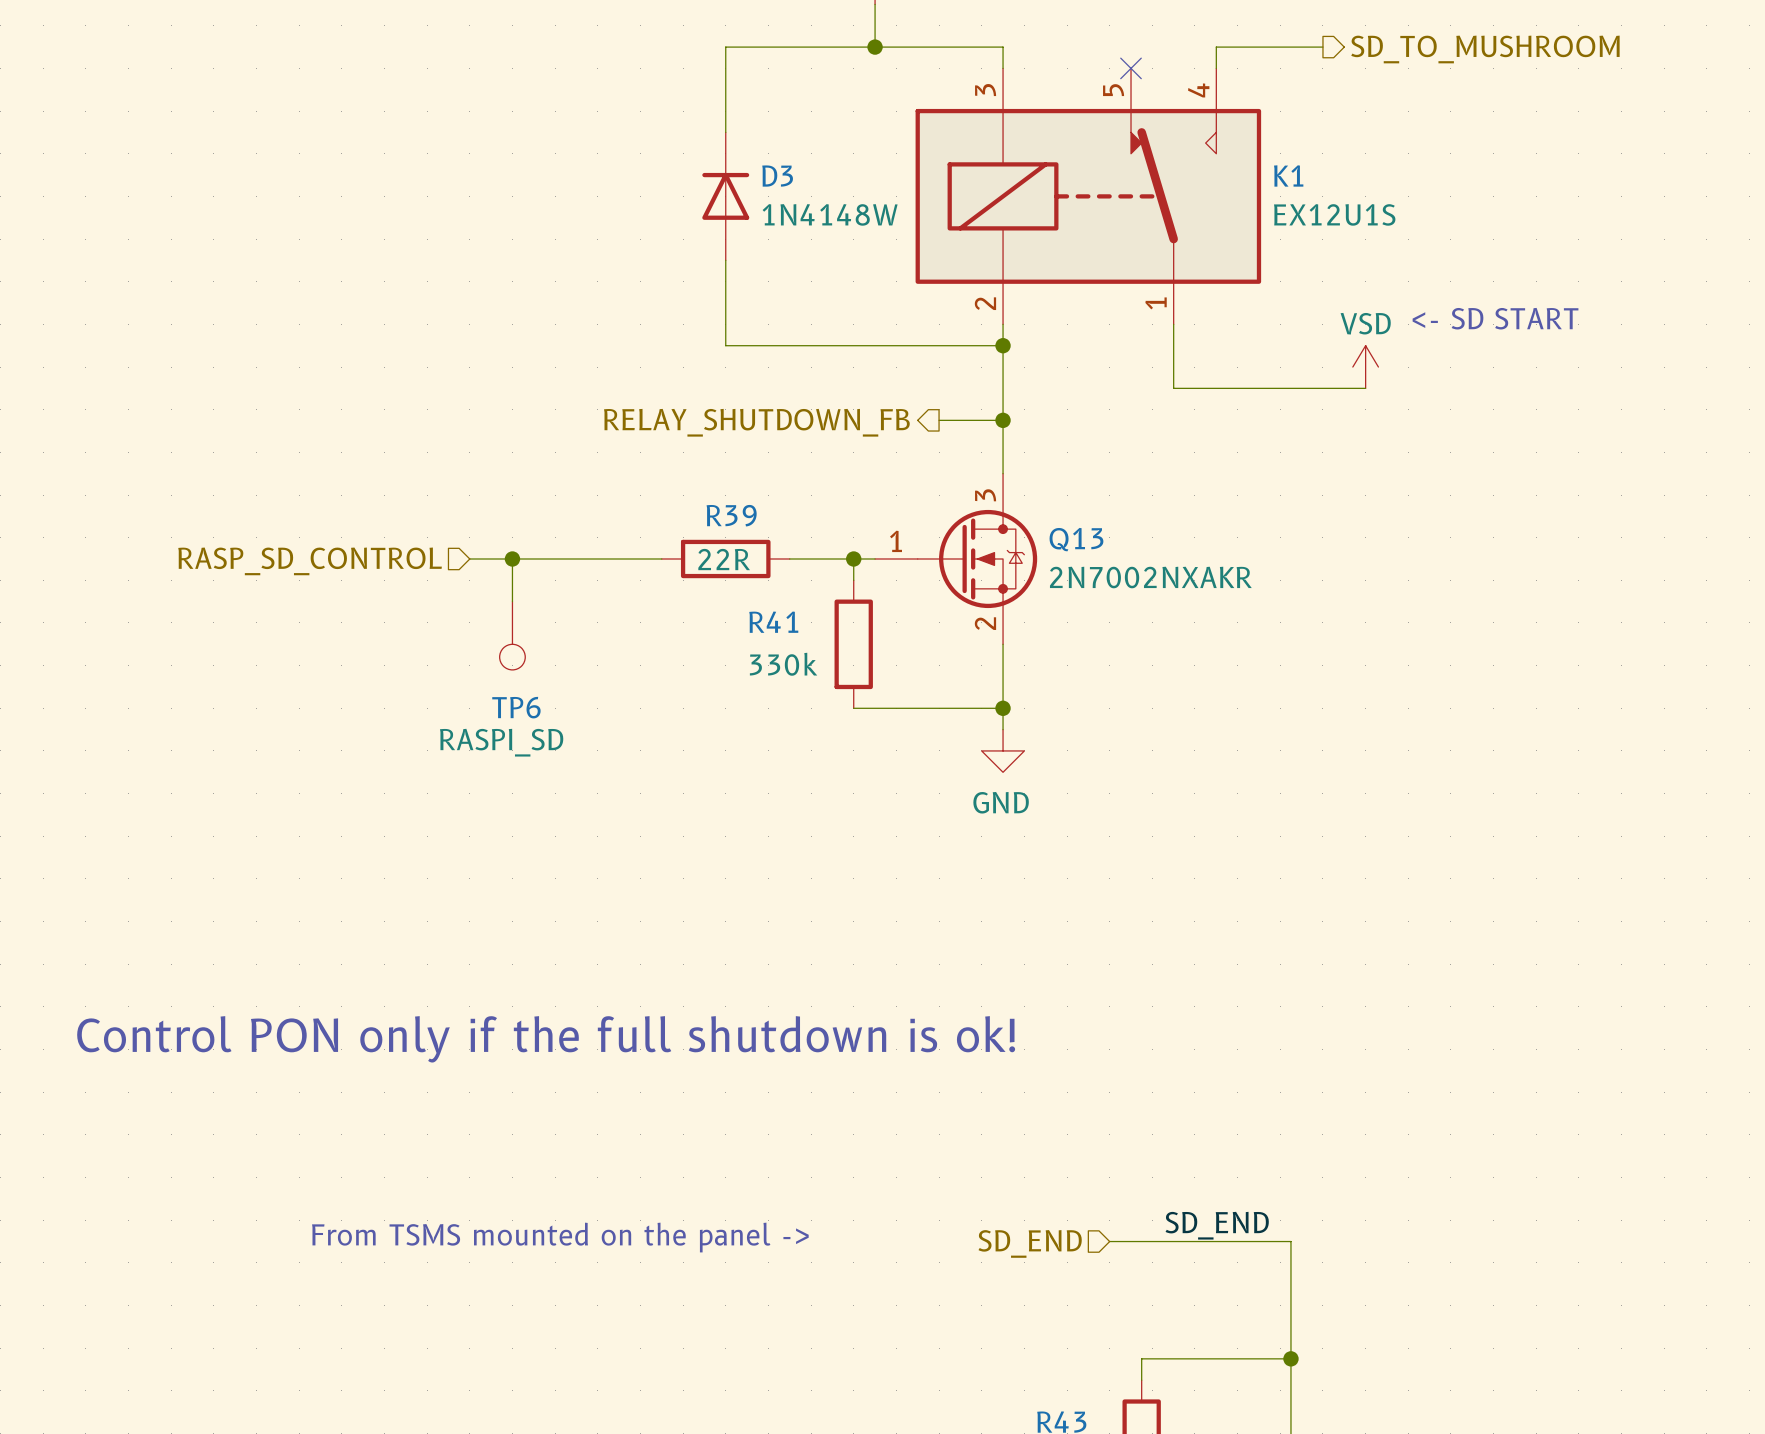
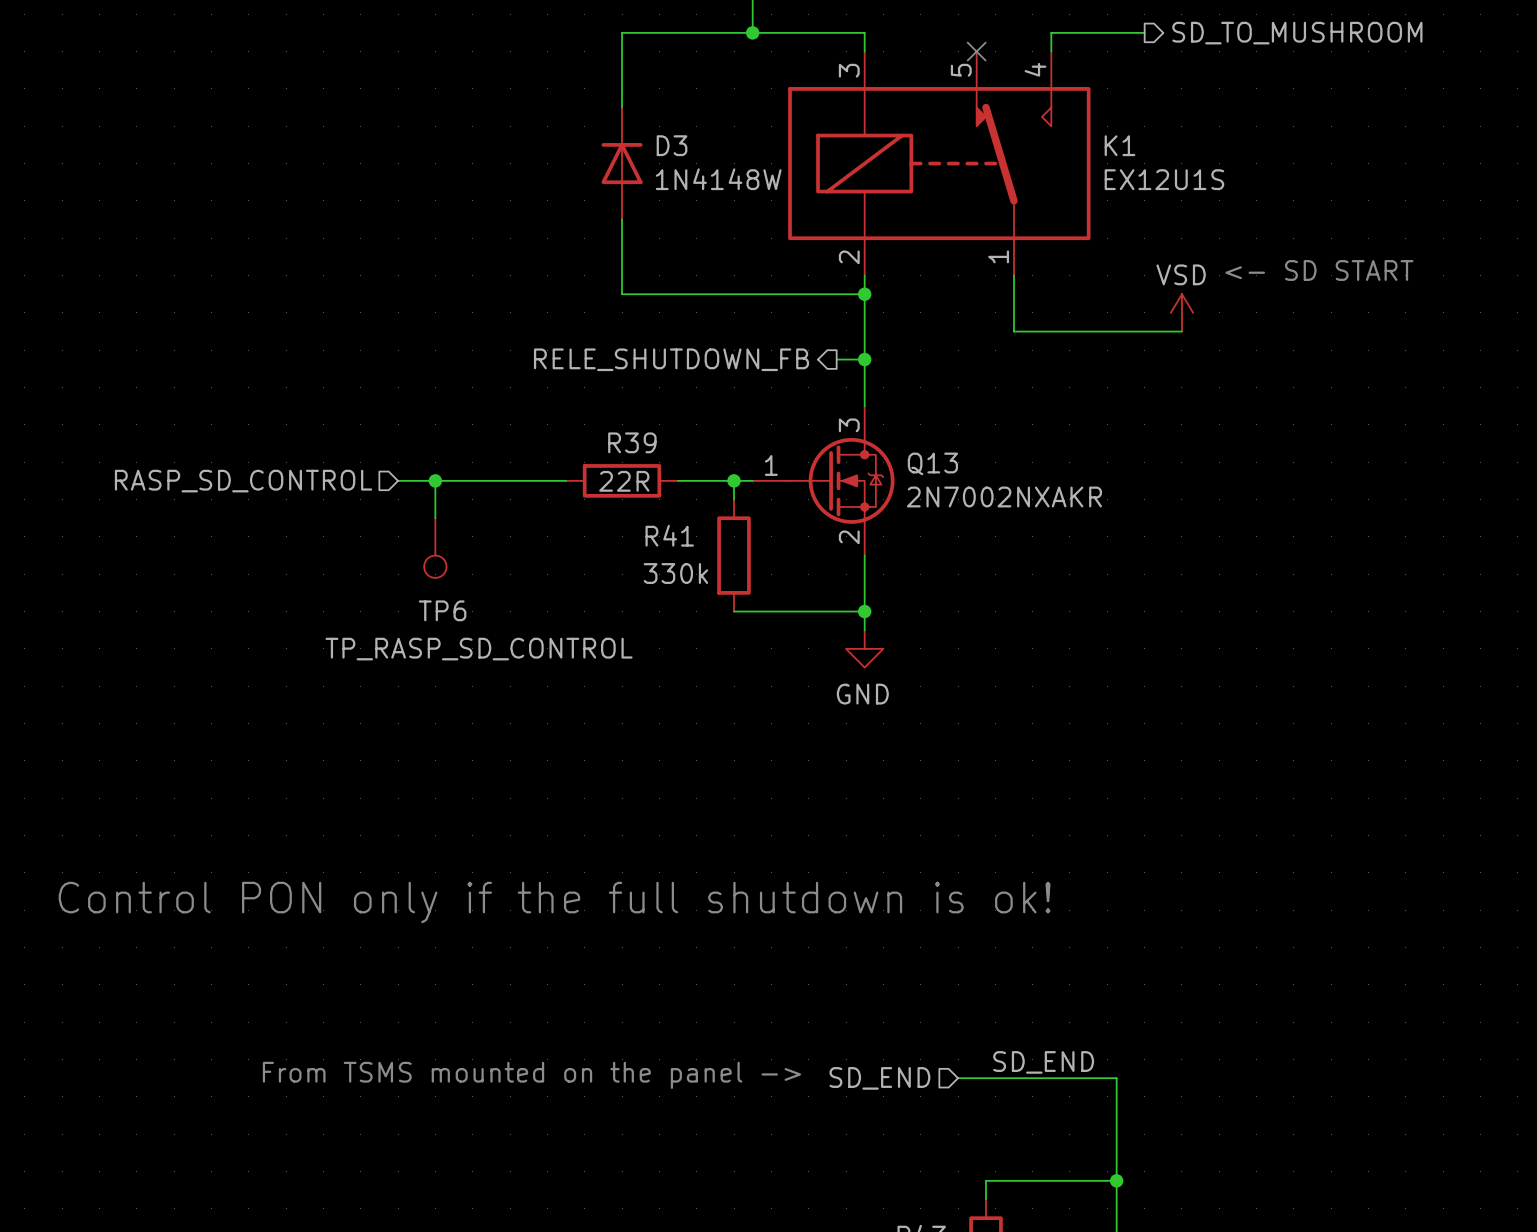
wire: (939, 420) (971, 420) -> none
hierarchical label: RELAY_SHUTDOWN_FB (756, 422) -> RELE_SHUTDOWN_FB (671, 359)
TP6 value: RASPI_SD (501, 742) -> TP_RASP_SD_CONTROL (479, 649)

